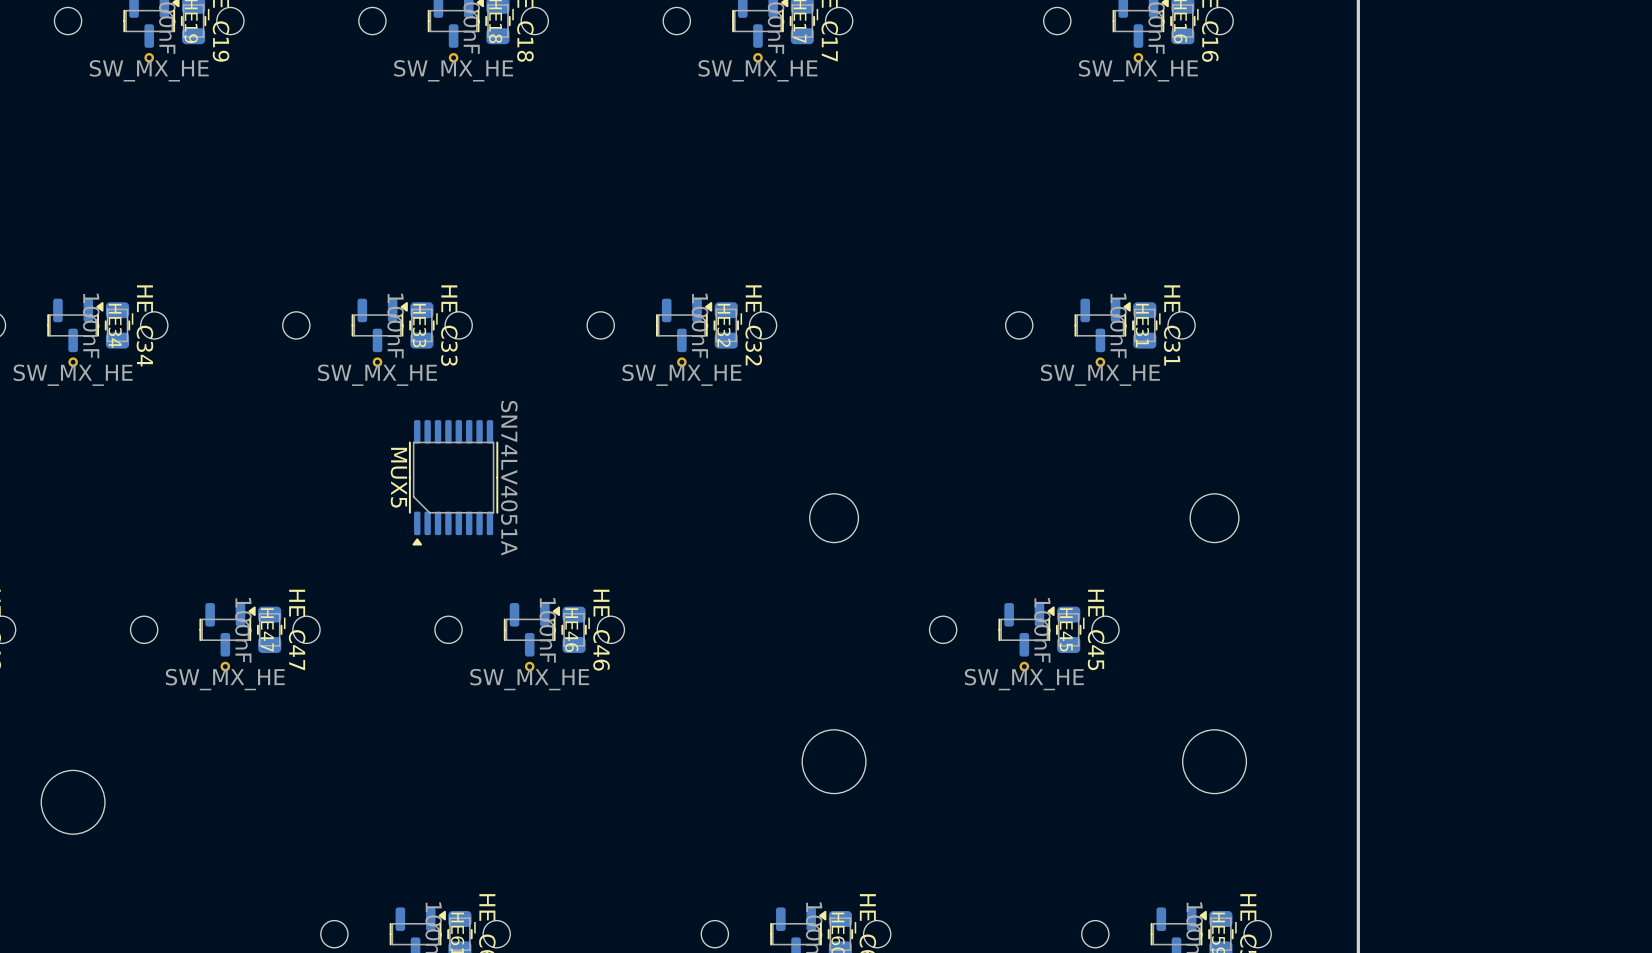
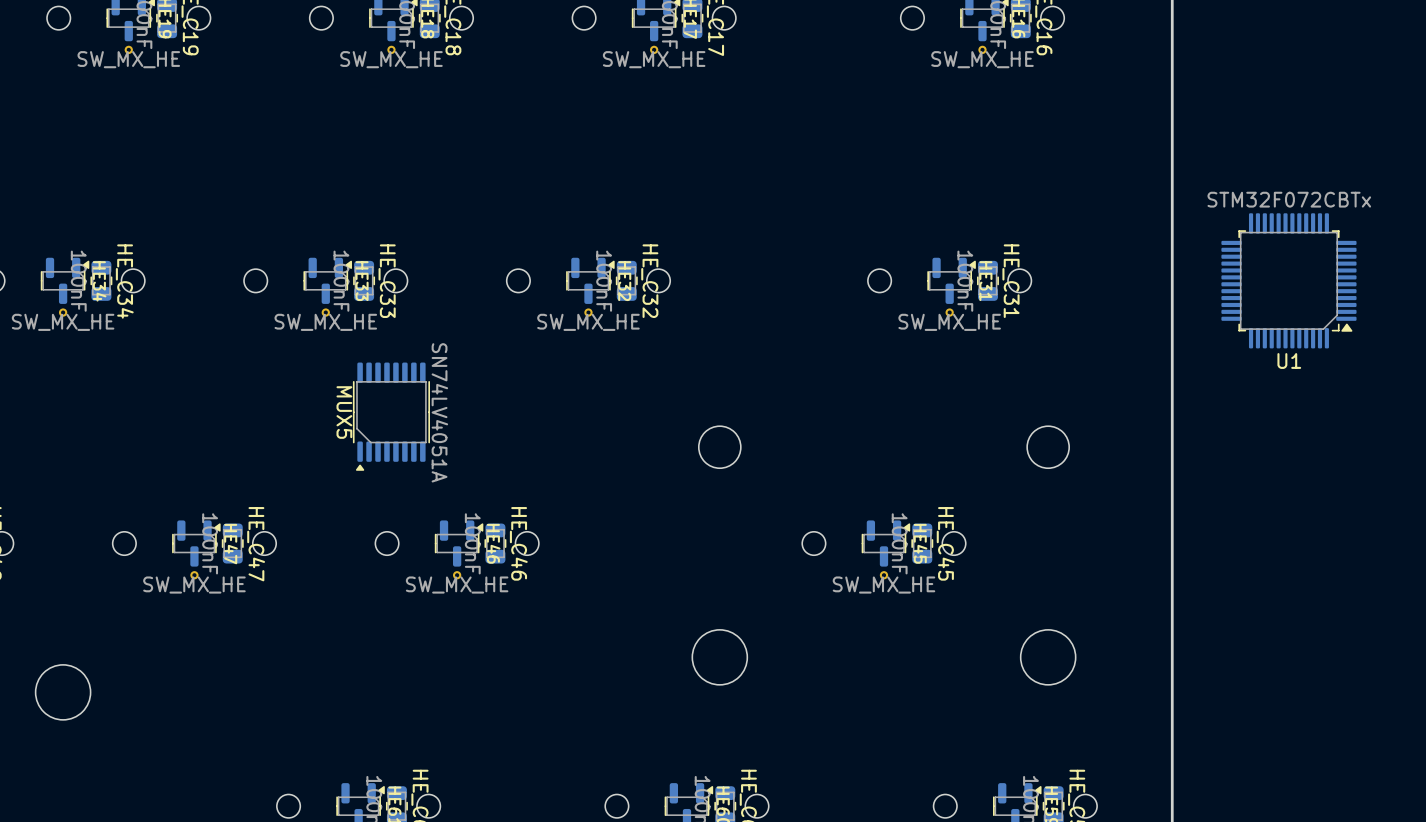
U1: none -> STM32F072CBTx (1288, 280)

